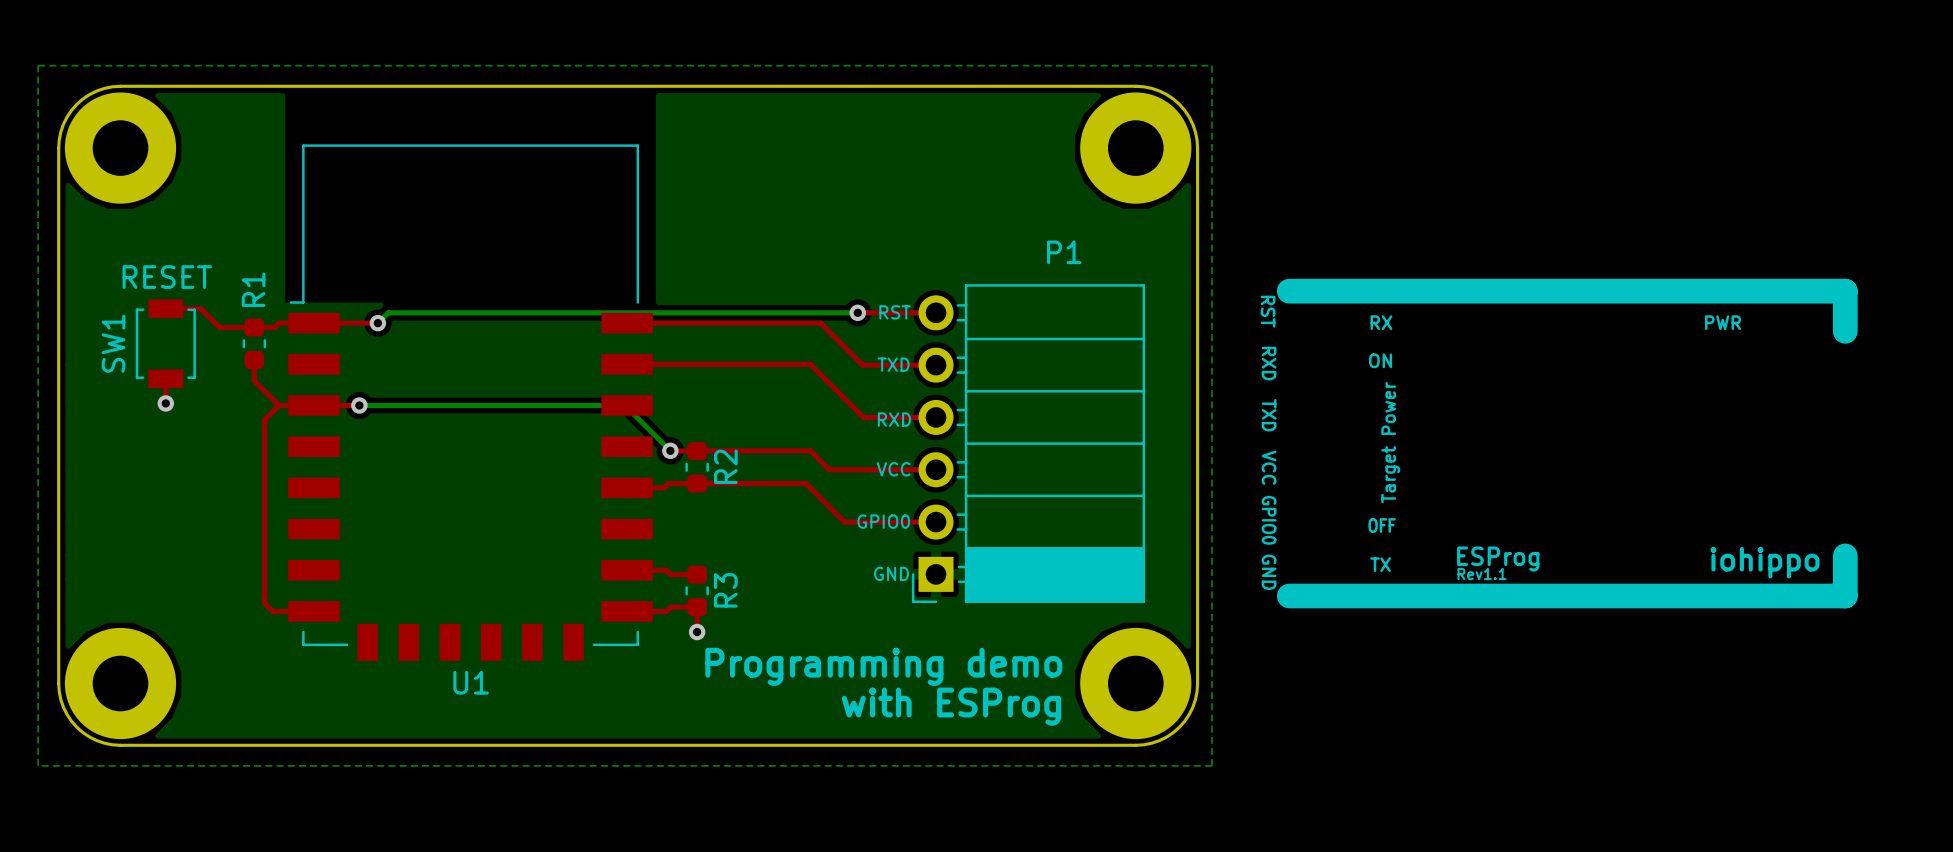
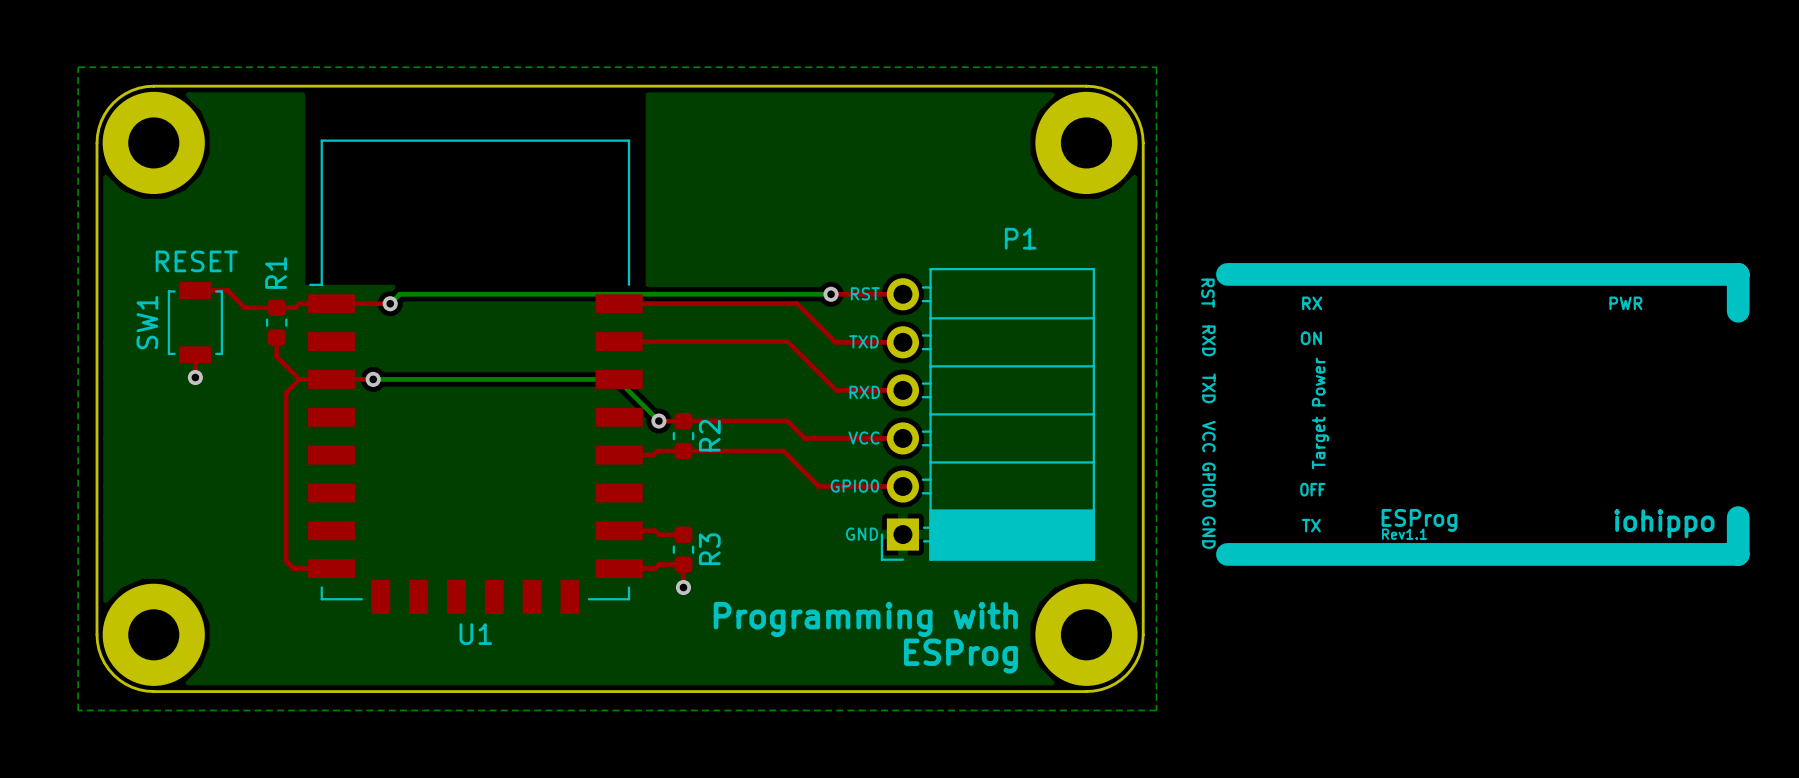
text: Programming demo (883, 666) -> Programming with (865, 619)
text: with ESProg (951, 706) -> ESProg (960, 656)

